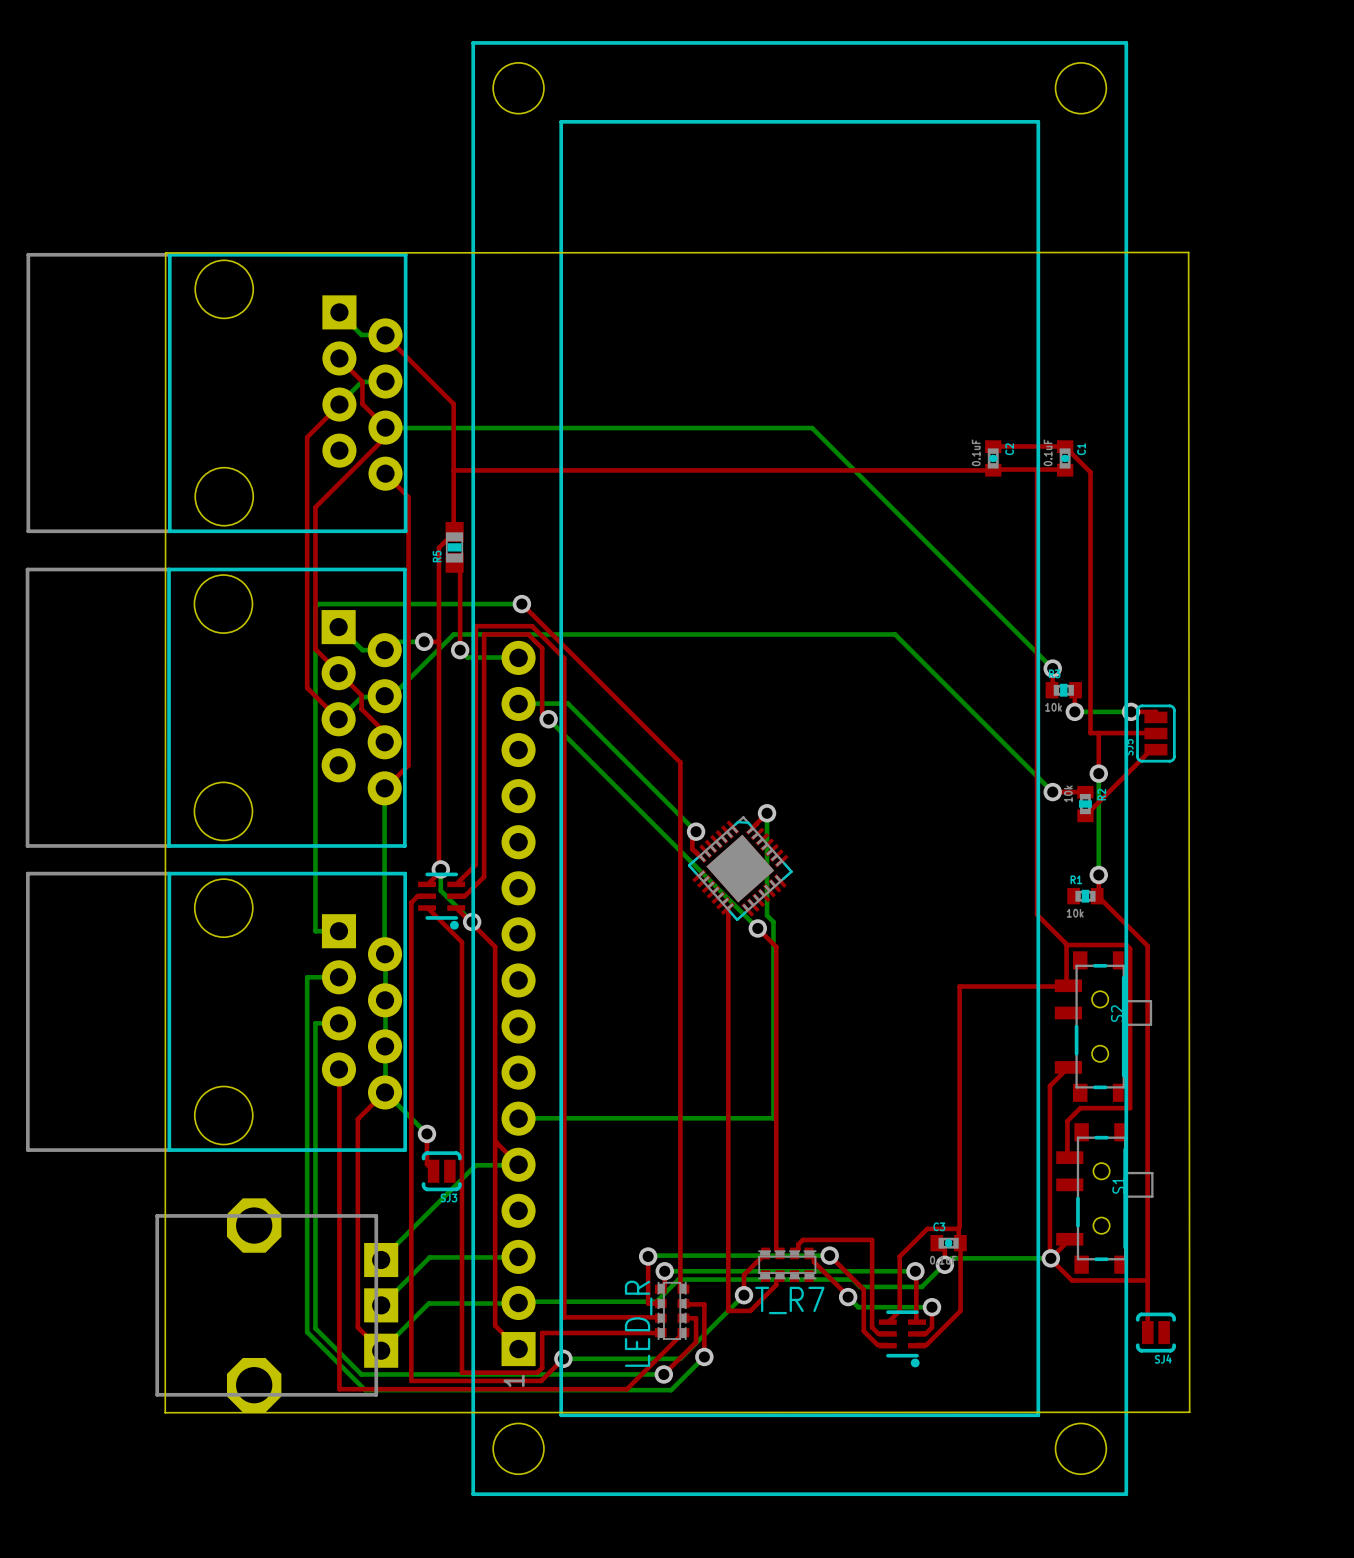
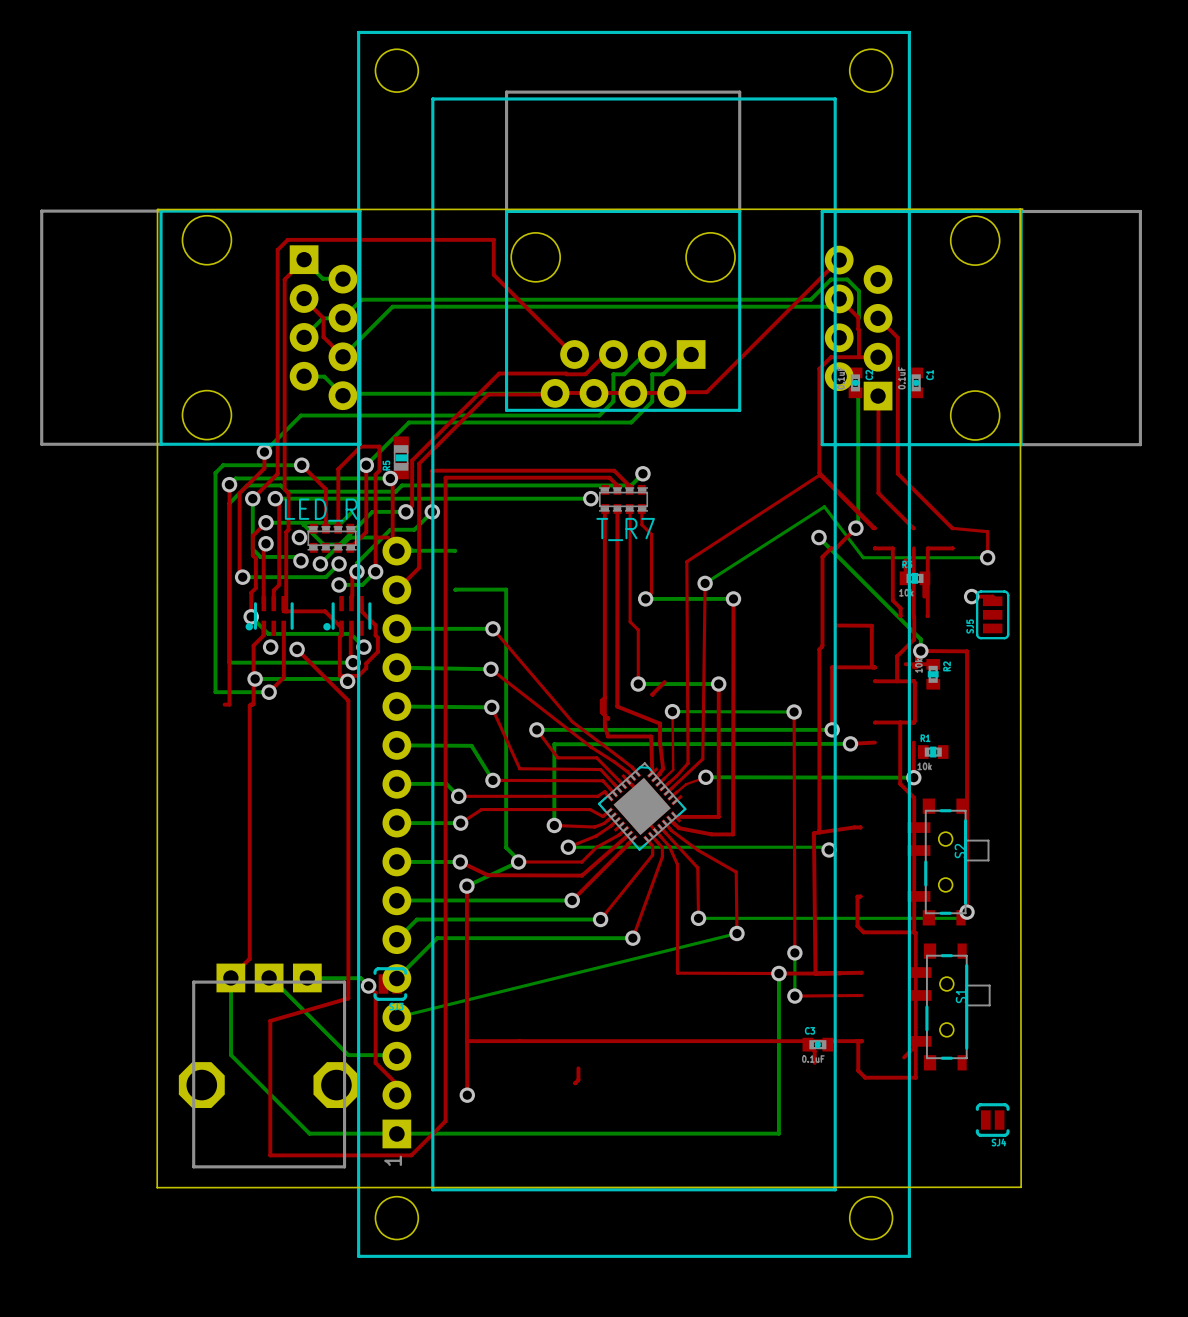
part: none -> (623, 251)
top track: none -> (304, 259) (284, 279) (284, 489) (288, 493) (288, 529) (286, 532) (286, 611)
top track: (385, 335) (453, 404) (454, 531) -> none
top track: none -> (839, 298) (858, 317) (859, 357)
bottom track: none -> (342, 317) (361, 299) (810, 299) (831, 279) (847, 279) (859, 291) (859, 318)
top track: none -> (878, 318) (897, 337) (897, 473) (952, 528) (987, 531) (987, 557)
part: none -> (981, 328)
top track: (339, 404) (307, 437) (307, 687) (338, 719) -> none
top track: none -> (574, 354) (493, 274) (493, 239) (287, 239) (277, 249) (277, 473) (252, 498)
top track: none -> (613, 354) (604, 354) (585, 374) (499, 373) (412, 460) (412, 505) (405, 511)
bottom track: none -> (652, 354) (643, 354) (624, 374) (613, 374) (613, 401) (599, 415) (300, 415) (264, 452)
bottom track: none -> (691, 354) (682, 354) (663, 374) (652, 374) (652, 401) (631, 422) (409, 422) (366, 465)
top track: (385, 427) (383, 428) (383, 439) (315, 507) (315, 649) (361, 695) (361, 709) (384, 732) (384, 742) -> none
bottom track: (385, 427) (812, 428) (1052, 668) -> (342, 356) (392, 306) (831, 306) (839, 298)
top track: none -> (878, 357) (831, 357) (819, 368) (819, 473) (874, 528) (819, 474) (686, 561) (688, 763) (664, 786)
top track: (993, 446) (1064, 446) (1090, 472) (1090, 733) (1155, 733) -> none
bottom track: none -> (304, 376) (324, 376) (342, 395) (345, 393) (555, 393)
top track: (1037, 469) (1037, 914) (1066, 945) -> none
top track: (453, 470) (637, 470) -> (419, 524) (419, 463) (488, 394) (553, 394) (555, 392)
top track: (1065, 470) (775, 470) -> (839, 260) (706, 392) (671, 392)
top track: (385, 473) (408, 497) (408, 765) (384, 788) -> none
bottom track: none -> (859, 396) (858, 528) (855, 528)
top track: none -> (878, 396) (878, 493) (913, 528)
top track: (454, 532) (438, 547) (438, 873) (427, 884) -> none
top track: none -> (264, 452) (264, 468) (239, 493) (239, 574) (242, 577)
via: none -> (264, 452)
top track: none -> (301, 465) (325, 489) (325, 528)
bottom track: none -> (301, 465) (223, 465) (215, 473) (215, 692) (269, 692)
via: none -> (301, 465)
top track: none -> (366, 465) (366, 532) (350, 547)
via: none -> (366, 465)
top track: (454, 562) (460, 569) (460, 650) -> none
bottom track: none -> (642, 473) (631, 485) (402, 485) (395, 491) (286, 491) (280, 485) (247, 485) (229, 503) (229, 662) (353, 662)
via: none -> (642, 473)
top track: none -> (390, 478) (392, 480) (392, 539) (396, 543) (396, 551)
bottom track: none -> (390, 478) (235, 478) (229, 484)
via: none -> (390, 478)
top track: none -> (229, 484) (229, 704) (224, 704)
via: none -> (229, 484)
top track: none -> (617, 489) (617, 485) (609, 477) (445, 477) (445, 1121) (411, 1155) (270, 1155) (270, 1020) (348, 998) (348, 700) (297, 649)
top track: none -> (629, 489) (629, 486) (614, 470) (432, 470) (432, 511)
bottom track: none -> (252, 498) (252, 549) (260, 556) (297, 556) (300, 560)
via: none -> (252, 498)
top track: none -> (275, 498) (279, 502) (279, 584) (273, 590) (273, 603)
bottom track: none -> (275, 498) (590, 498)
via: none -> (275, 498)
via: none -> (590, 498)
top track: (521, 604) (680, 762) (680, 1286) (683, 1289) -> none
bottom track: (521, 604) (318, 604) (315, 606) (315, 931) (338, 931) -> none
via: (521, 604) -> none
top track: none -> (605, 509) (604, 725) (607, 736) (651, 736) (652, 772)
top track: none -> (617, 509) (617, 706) (660, 723) (663, 768) (656, 777)
top track: none -> (629, 509) (630, 621) (638, 630) (638, 684)
bottom track: none -> (405, 511) (372, 511) (320, 563)
via: none -> (405, 511)
bottom track: none -> (432, 511) (414, 529) (390, 529) (356, 563) (356, 571)
via: none -> (432, 511)
top track: none -> (642, 511) (641, 509) (641, 524) (651, 534) (651, 593) (645, 598)
bottom track: none -> (351, 512) (341, 522) (266, 522)
top track: none -> (266, 522) (252, 535) (252, 555) (255, 558) (255, 588) (251, 592) (251, 616)
via: none -> (266, 522)
top track: (475, 626) (532, 626) (564, 658) (564, 1317) (660, 1318) -> none
top track: none -> (855, 528) (836, 548) (831, 548) (822, 556) (822, 645) (819, 649) (819, 832)
via: none -> (855, 528)
top track: none -> (338, 528) (338, 469) (360, 446) (379, 446) (379, 470) (375, 474) (375, 571)
via: none -> (299, 537)
via: (424, 641) -> none
bottom track: none -> (818, 537) (920, 639) (920, 650)
via: none -> (818, 537)
LED_R: none -> (332, 538)
top track: none -> (266, 543) (263, 546) (263, 603)
via: none -> (266, 543)
via: (460, 650) -> none
top track: none -> (874, 548) (892, 548) (892, 600) (900, 608) (900, 616)
top track: none -> (913, 548) (914, 639) (897, 656) (897, 681)
top track: none -> (952, 548) (927, 548) (927, 616)
bottom track: none -> (987, 557) (863, 557) (824, 506) (705, 583)
via: none -> (987, 557)
via: (1052, 668) -> none
via: none -> (300, 560)
via: none -> (320, 563)
bottom track: none -> (339, 563) (325, 577) (242, 577)
via: none -> (339, 563)
top track: (475, 677) (475, 864) (456, 884) -> (419, 567) (396, 589)
top track: none -> (356, 571) (352, 576) (351, 603)
via: none -> (356, 571)
bottom track: none -> (375, 571) (362, 584) (339, 584)
via: none -> (375, 571)
via: none -> (242, 577)
top track: none -> (705, 583) (702, 759) (668, 791)
via: none -> (705, 583)
via: none -> (339, 584)
bottom track: (567, 703) (696, 831) -> (496, 589) (506, 589) (506, 847) (518, 862) (466, 886)
part: (216, 707) -> none
bottom track: (1074, 711) (1131, 711) -> none
via: (1074, 711) -> none
bottom track: none -> (645, 598) (733, 598)
via: none -> (645, 598)
top track: none -> (733, 598) (733, 834) (711, 834) (679, 828) (671, 820)
via: none -> (733, 598)
bottom track: (338, 719) (361, 697) (391, 696) (453, 634) (895, 634) (1052, 792) -> none
top track: (548, 719) (542, 712) (542, 648) (528, 634) (484, 634) (484, 876) (464, 896) (456, 896) -> none
bottom track: (548, 719) (757, 928) -> none
via: (548, 719) -> none
top track: none -> (283, 603) (283, 611) (325, 611) (341, 627) (339, 675) (358, 675) (366, 668) (366, 663) (377, 651) (375, 625) (361, 611) (361, 603)
top track: (1098, 733) (1098, 773) -> none
part: none -> (269, 615)
part: none -> (347, 615)
bottom track: none -> (251, 616) (268, 633) (350, 633) (363, 647)
via: none -> (251, 616)
top track: none -> (836, 625) (871, 625) (871, 666) (874, 667)
top track: none -> (263, 628) (263, 635) (253, 645) (253, 703) (249, 706) (249, 958) (230, 977)
top track: none -> (283, 628) (283, 677) (269, 692)
top track: none -> (351, 628) (350, 660) (353, 662)
top track: (1155, 749) (1151, 749) (1085, 815) -> none
bottom track: none -> (396, 628) (492, 628)
top track: none -> (492, 628) (572, 721) (635, 771)
via: none -> (492, 628)
part position: (799, 768) -> (634, 644)
via: none -> (270, 647)
via: none -> (363, 647)
bottom track: (1098, 773) (1098, 875) -> none
via: (1098, 773) -> none
via: none -> (297, 649)
via: none -> (920, 650)
bottom track: (384, 788) (385, 1092) (426, 1133) -> none
via: none -> (353, 662)
via: (1052, 792) -> none
top track: none -> (874, 667) (832, 667) (832, 729)
top track: none -> (913, 667) (916, 666) (916, 654) (920, 650) (967, 651) (967, 912)
bottom track: none -> (396, 667) (491, 669)
top track: none -> (491, 669) (590, 746) (631, 775)
via: none -> (491, 669)
bottom track: none -> (255, 678) (345, 678) (347, 681)
via: none -> (255, 678)
via: none -> (347, 681)
top track: none -> (874, 681) (913, 681) (914, 682) (913, 722) (874, 722)
bottom track: (767, 813) (767, 915) (773, 922) (773, 1118) (518, 1118) -> none
via: (767, 813) -> none
bottom track: none -> (638, 684) (718, 684)
via: none -> (638, 684)
top track: none -> (718, 684) (718, 816) (675, 816)
via: none -> (718, 684)
via: none -> (269, 692)
via: (696, 831) -> none
bottom track: none -> (396, 706) (491, 707)
top track: none -> (491, 707) (519, 768) (600, 769) (617, 787)
via: none -> (491, 707)
top track: none -> (672, 711) (673, 769) (660, 781)
bottom track: none -> (672, 711) (794, 712)
via: none -> (672, 711)
top track: none -> (794, 712) (794, 952)
via: none -> (794, 712)
top track: none -> (900, 722) (900, 783) (914, 797) (914, 932)
part position: (740, 868) -> (642, 806)
bottom track: (440, 869) (440, 890) (472, 922) -> none
via: (440, 869) -> none
top track: none -> (536, 729) (557, 757) (596, 757) (622, 783)
bottom track: none -> (536, 729) (832, 729)
via: none -> (536, 729)
via: none -> (832, 729)
top track: (1098, 875) (1097, 896) (1147, 945) (1147, 1332) -> none
via: (1098, 875) -> none
top track: none -> (874, 742) (850, 743)
top track: none -> (913, 742) (913, 777)
bottom track: none -> (850, 743) (554, 744) (554, 825)
via: none -> (850, 743)
bottom track: none -> (396, 745) (471, 745) (492, 780)
top track: (427, 896) (417, 896) (411, 902) (411, 1380) (541, 1380) (563, 1358) -> none
part: (441, 901) -> none
top track: (427, 907) (462, 942) (462, 1372) (537, 1372) (542, 1368) (542, 1333) (660, 1332) -> none
top track: (456, 908) (495, 946) (495, 1141) (518, 1164) -> none
top track: (727, 908) (728, 1310) (750, 1310) (776, 1285) (776, 1280) (780, 1276) -> none
via: (472, 922) -> none
top track: none -> (705, 777) (686, 784) (672, 795)
bottom track: none -> (705, 777) (913, 777)
via: none -> (705, 777)
via: none -> (913, 777)
top track: (757, 928) (776, 946) (776, 1249) (780, 1253) -> none
via: (757, 928) -> none
top track: none -> (492, 780) (602, 780) (612, 791)
via: none -> (492, 780)
top track: none -> (626, 779) (642, 795) (642, 806) (648, 823) (669, 846) (677, 864) (677, 973) (840, 973)
bottom track: none -> (396, 784) (446, 783) (458, 796)
top track: (1066, 945) (1126, 945) (1130, 948) (1130, 1108) (1080, 1108) (1067, 1121) (1067, 1155) (1069, 1157) -> none
top track: (1066, 945) (1066, 984) (1068, 986) (959, 986) (958, 1228) -> none
via: none -> (458, 796)
top track: none -> (608, 795) (604, 791) (597, 796) (458, 796)
top track: none -> (607, 812) (602, 816) (590, 809) (481, 809) (460, 823)
top track: none -> (611, 817) (604, 823) (594, 827) (554, 825)
bottom track: (338, 977) (307, 977) (307, 1332) (365, 1390) (671, 1390) (704, 1356) -> none
top track: none -> (615, 821) (596, 835) (568, 847)
bottom track: none -> (396, 823) (460, 823)
via: none -> (460, 823)
top track: none -> (666, 825) (698, 850) (736, 872) (736, 933)
via: none -> (554, 825)
top track: none -> (860, 827) (813, 833) (815, 973) (861, 972)
top track: none -> (662, 829) (697, 867) (698, 918)
top track: none -> (623, 831) (596, 847) (581, 862) (518, 862)
top track: none -> (627, 835) (581, 875) (487, 875) (460, 862)
top track: none -> (653, 837) (662, 847) (662, 856) (632, 938)
top track: none -> (631, 840) (572, 900)
top track: none -> (648, 841) (652, 846) (652, 855) (600, 919)
bottom track: none -> (568, 847) (824, 847) (829, 849)
via: none -> (568, 847)
part: (216, 1011) -> none
via: none -> (829, 849)
bottom track: (338, 1023) (315, 1023) (315, 1328) (361, 1374) (663, 1374) -> none
bottom track: none -> (396, 861) (460, 862)
via: none -> (460, 862)
via: none -> (518, 862)
top track: none -> (466, 886) (466, 1041)
via: none -> (466, 886)
top track: none -> (860, 896) (857, 896) (857, 926) (863, 932) (914, 932)
top track: (1068, 1067) (1049, 1086) (1049, 1256) (1072, 1280) (1147, 1280) -> none
top track: (338, 1069) (339, 1389) (626, 1389) (683, 1332) -> none
bottom track: none -> (572, 900) (396, 900)
via: none -> (572, 900)
bottom track: none -> (967, 912) (960, 918) (698, 918)
via: none -> (967, 912)
top track: (385, 1092) (357, 1119) (357, 1327) (380, 1350) -> none
via: none -> (698, 918)
bottom track: none -> (600, 919) (417, 919) (396, 939)
via: none -> (600, 919)
top track: none -> (914, 932) (915, 933) (915, 1077) (865, 1077) (858, 1070) (858, 1041) (861, 1041) (861, 1041) (856, 1041) (466, 1041)
bottom track: none -> (736, 933) (396, 1017)
via: none -> (736, 933)
bottom track: none -> (632, 938) (437, 938) (396, 978)
via: none -> (632, 938)
top track: (426, 1133) (426, 1164) (433, 1171) -> none
via position: (426, 1133) -> (368, 985)
bottom track: none -> (794, 952) (794, 996)
via: none -> (794, 952)
top track: (496, 1142) (495, 1325) (518, 1349) -> none
bottom track: none -> (778, 973) (778, 1133) (309, 1133) (231, 1055) (231, 978)
via: none -> (778, 973)
bottom track: none -> (269, 978) (271, 978) (348, 1055) (396, 1056)
bottom track: none -> (307, 977) (360, 978) (368, 985)
bottom track: (518, 1164) (475, 1165) (381, 1260) -> none
top track: none -> (368, 985) (375, 992) (375, 1062) (396, 1083) (396, 1095)
top track: none -> (861, 995) (794, 996)
via: none -> (794, 996)
top track: (958, 1228) (927, 1228) (899, 1256) (899, 1310) (887, 1322) -> none
top track: (958, 1228) (958, 1241) (960, 1243) (960, 1310) (926, 1344) (917, 1345) -> none
top track: none -> (466, 1041) (467, 1095)
top track: (765, 1253) (743, 1274) (743, 1295) -> none
top track: (794, 1253) (802, 1239) (872, 1239) (872, 1327) (878, 1333) (887, 1333) -> none
top track: (809, 1253) (814, 1258) (814, 1262) (848, 1297) -> none
top track: (829, 1255) (863, 1289) (863, 1331) (877, 1344) (887, 1345) -> none
bottom track: (829, 1255) (648, 1256) -> none
via: (829, 1255) -> none
bottom track: (518, 1256) (429, 1257) (381, 1305) -> none
top track: (648, 1256) (648, 1303) (660, 1303) -> none
via: (648, 1256) -> none
bottom track: (1050, 1258) (951, 1258) (921, 1286) (860, 1286) (852, 1279) (678, 1279) (656, 1301) (428, 1303) (381, 1350) -> none
via: (1050, 1258) -> none
T_R7 position: (787, 1264) -> (623, 499)
via: (944, 1264) -> none
bottom track: (664, 1271) (915, 1271) -> none
via: (664, 1271) -> none
top track: (915, 1271) (917, 1322) -> none
via: (915, 1271) -> none
bottom track: (743, 1295) (680, 1358) (563, 1358) -> none
via: (743, 1295) -> none
bottom track: (848, 1297) (858, 1307) (931, 1307) -> none
via: (848, 1297) -> none
via: none -> (467, 1095)
top track: (683, 1303) (704, 1304) (704, 1356) -> none
part rotation: 0° (276, 1305) -> 90° counterclockwise (269, 1065)
top track: (931, 1307) (931, 1327) (925, 1333) (917, 1333) -> none
via: (931, 1307) -> none
LED_R: (672, 1310) -> none
top track: (683, 1318) (696, 1318) (696, 1342) (663, 1374) -> none
part: (902, 1338) -> none
via: (704, 1356) -> none
via: (563, 1358) -> none
via: (663, 1374) -> none

